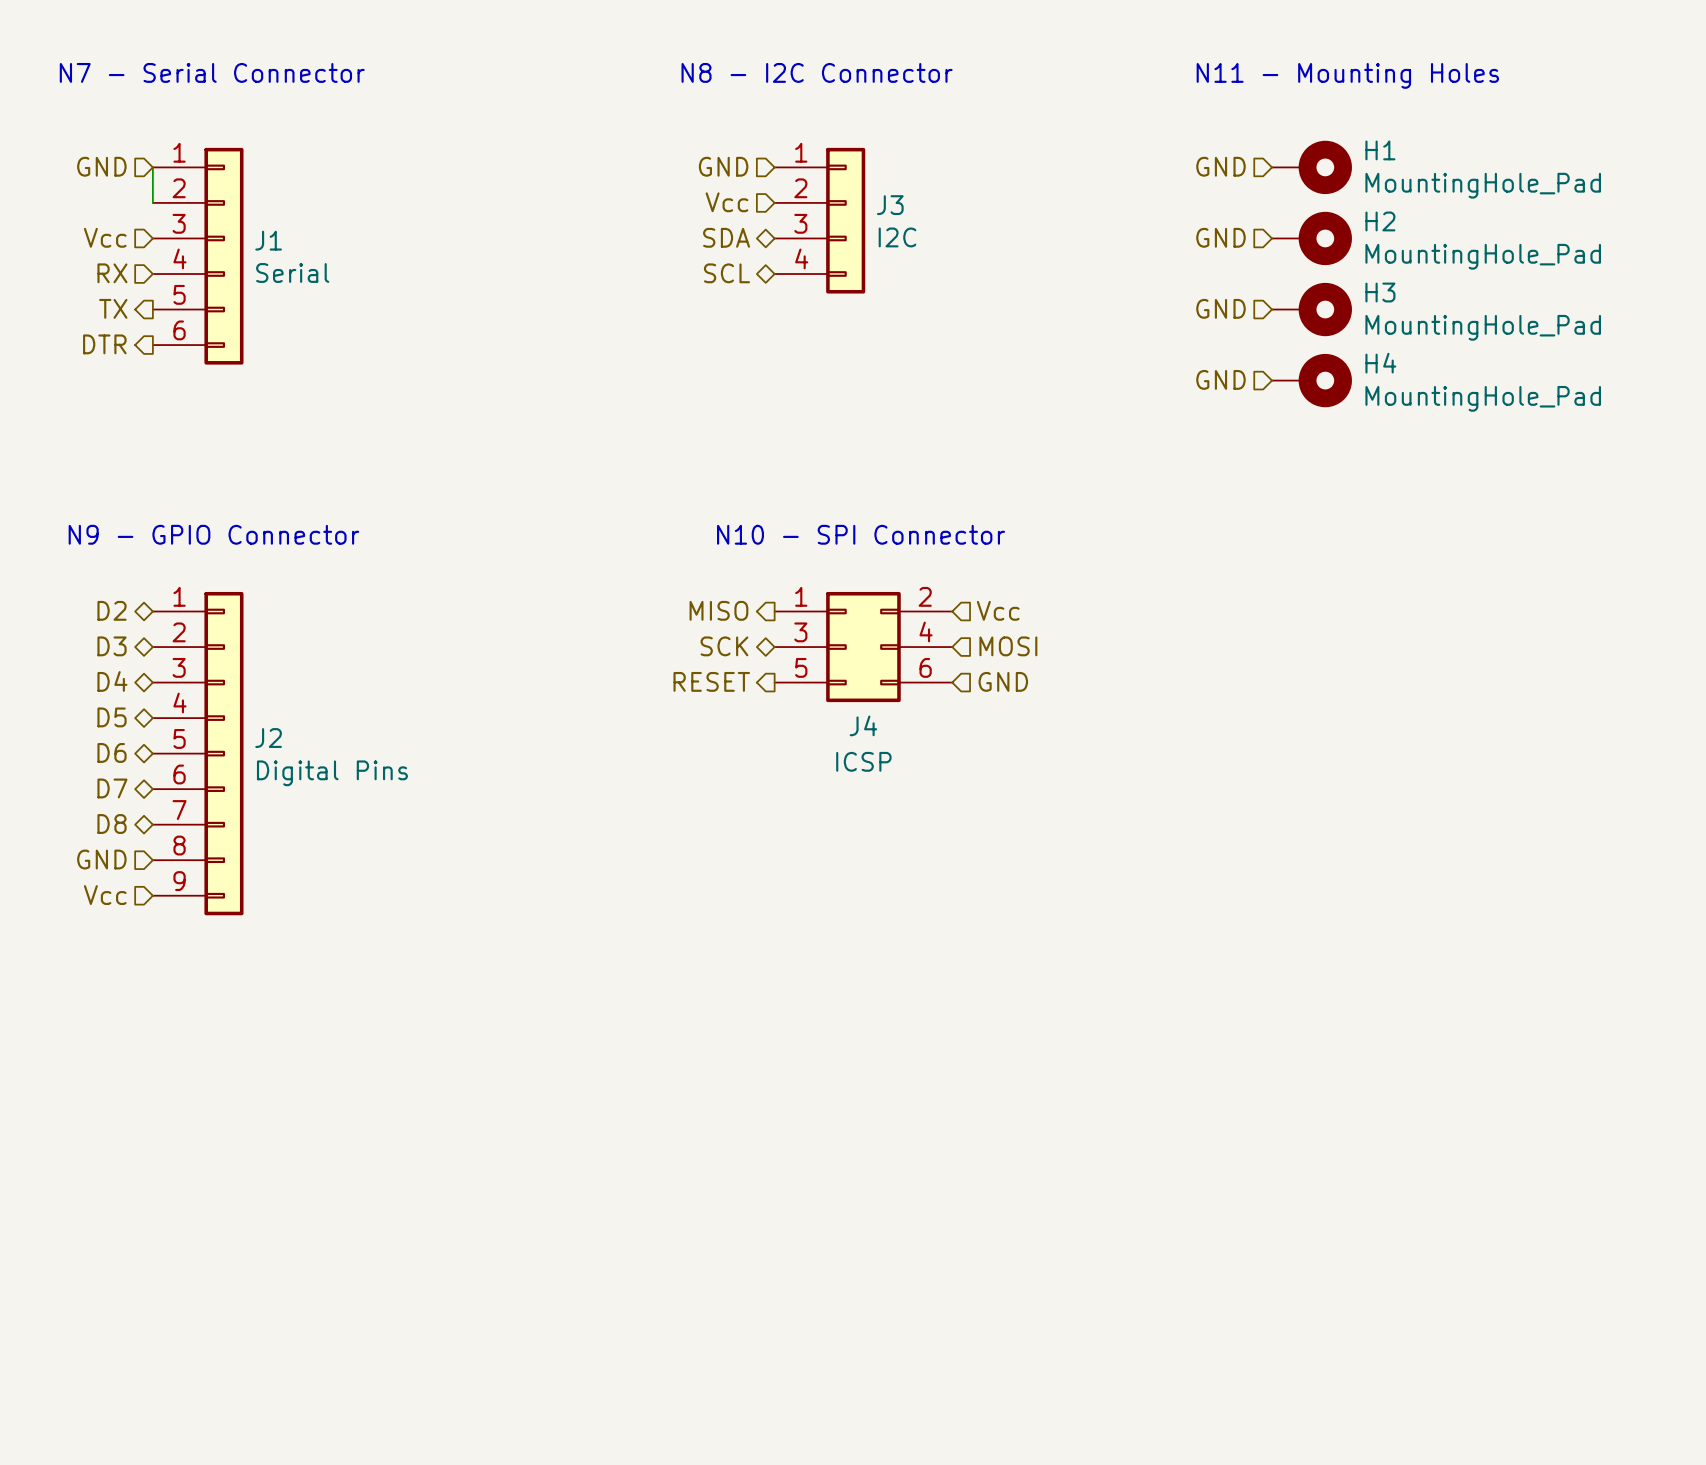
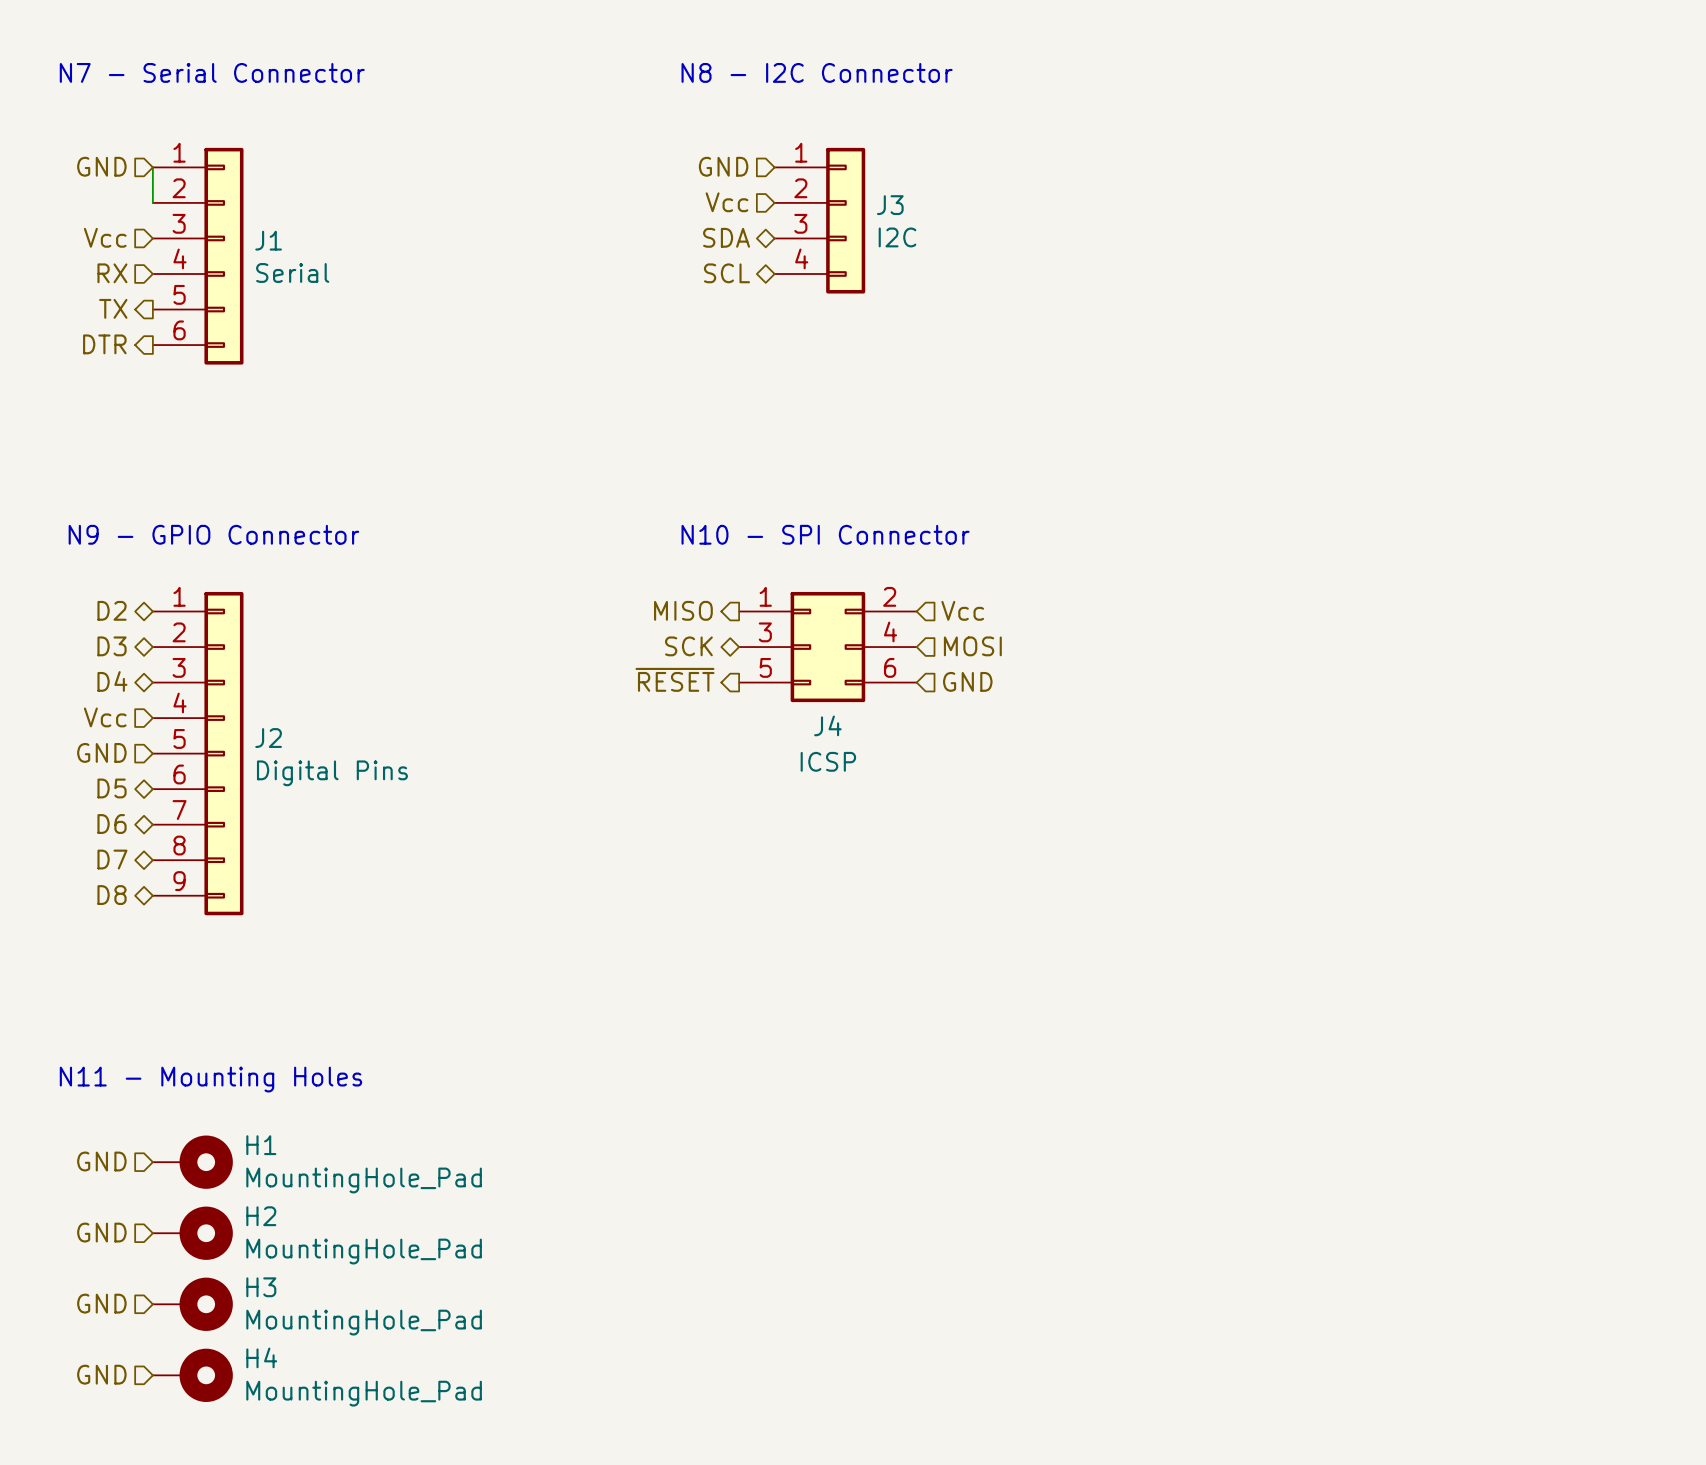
text: N11 - Mounting Holes (1347, 75) -> none
hierarchical label: GND (1220, 166) -> none
H1 position: (1311, 167) -> (192, 1162)
hierarchical label: GND (1220, 237) -> none
H2 position: (1311, 238) -> (192, 1233)
hierarchical label: GND (1220, 308) -> none
H3 position: (1311, 309) -> (192, 1304)
hierarchical label: GND (1220, 379) -> none
H4 position: (1311, 380) -> (192, 1375)
text position: N10 - SPI Connector (861, 534) -> N10 - SPI Connector (825, 534)
hierarchical label position: MISO (718, 610) -> MISO (683, 610)
hierarchical label position: Vcc (998, 610) -> Vcc (962, 610)
hierarchical label position: SCK (724, 646) -> SCK (688, 646)
hierarchical label position: MOSI (1008, 646) -> MOSI (972, 646)
J4 position: (863, 647) -> (827, 647)
hierarchical label: RESET (711, 681) -> ~{RESET} (675, 679)
hierarchical label position: GND (1003, 681) -> GND (967, 681)
hierarchical label shape: bidirectional (112, 717) -> input (105, 717)
hierarchical label: D5 (112, 717) -> Vcc (105, 717)
hierarchical label shape: bidirectional (112, 752) -> input (101, 752)
hierarchical label: D6 (112, 752) -> GND (101, 752)
hierarchical label: D7 (112, 788) -> D5 (112, 788)
hierarchical label: D8 (112, 824) -> D6 (112, 824)
hierarchical label shape: input (101, 859) -> bidirectional (112, 859)
hierarchical label: GND (101, 859) -> D7 (112, 859)
hierarchical label shape: input (105, 895) -> bidirectional (112, 895)
hierarchical label: Vcc (105, 895) -> D8 (112, 895)
text: none -> N11 - Mounting Holes (210, 1079)
hierarchical label: none -> GND (101, 1161)
hierarchical label: none -> GND (101, 1232)
hierarchical label: none -> GND (101, 1303)
hierarchical label: none -> GND (101, 1374)

